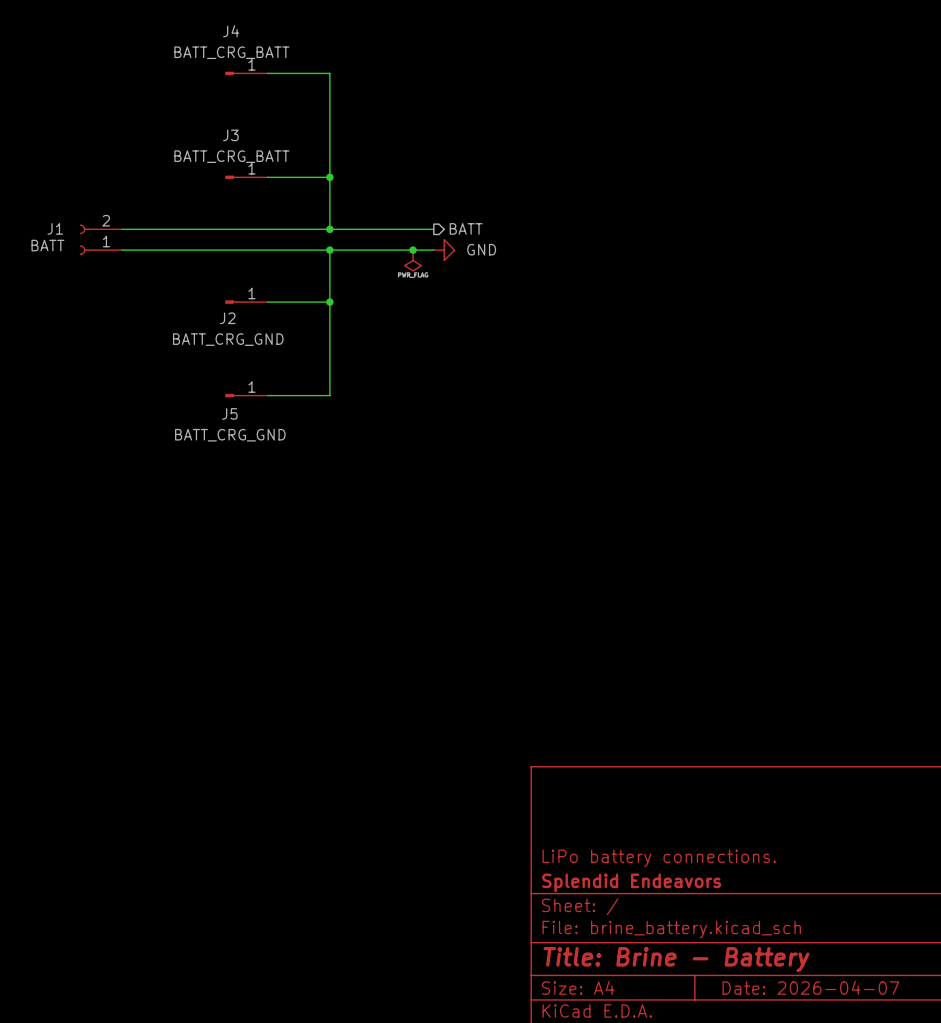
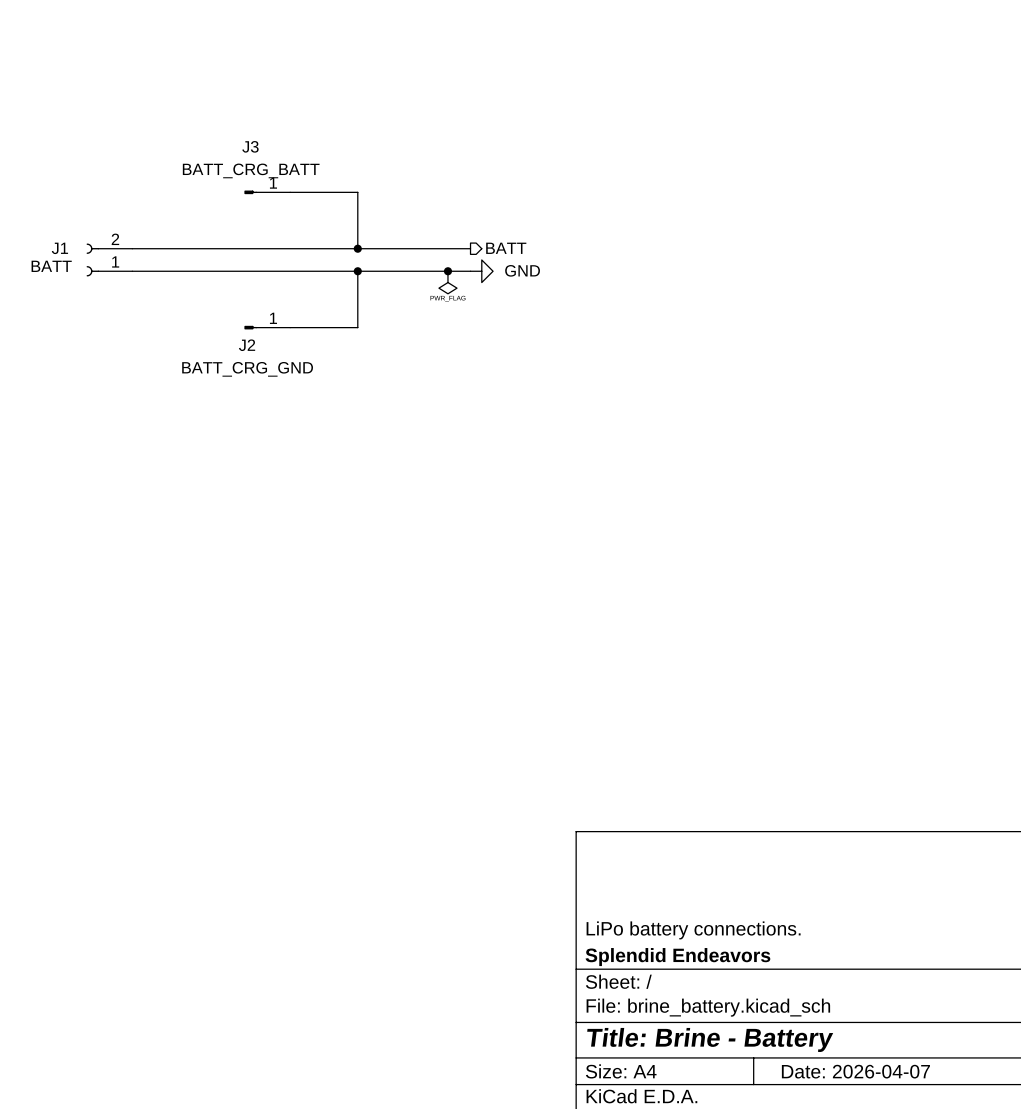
J4: BATT_CRG_BATT (246, 73) -> none
wire: (267, 73) (329, 73) (329, 177) -> none
junction: (329, 177) -> none
wire: (329, 302) (329, 395) (267, 395) -> none
junction: (329, 302) -> none
J5: BATT_CRG_GND (246, 395) -> none

